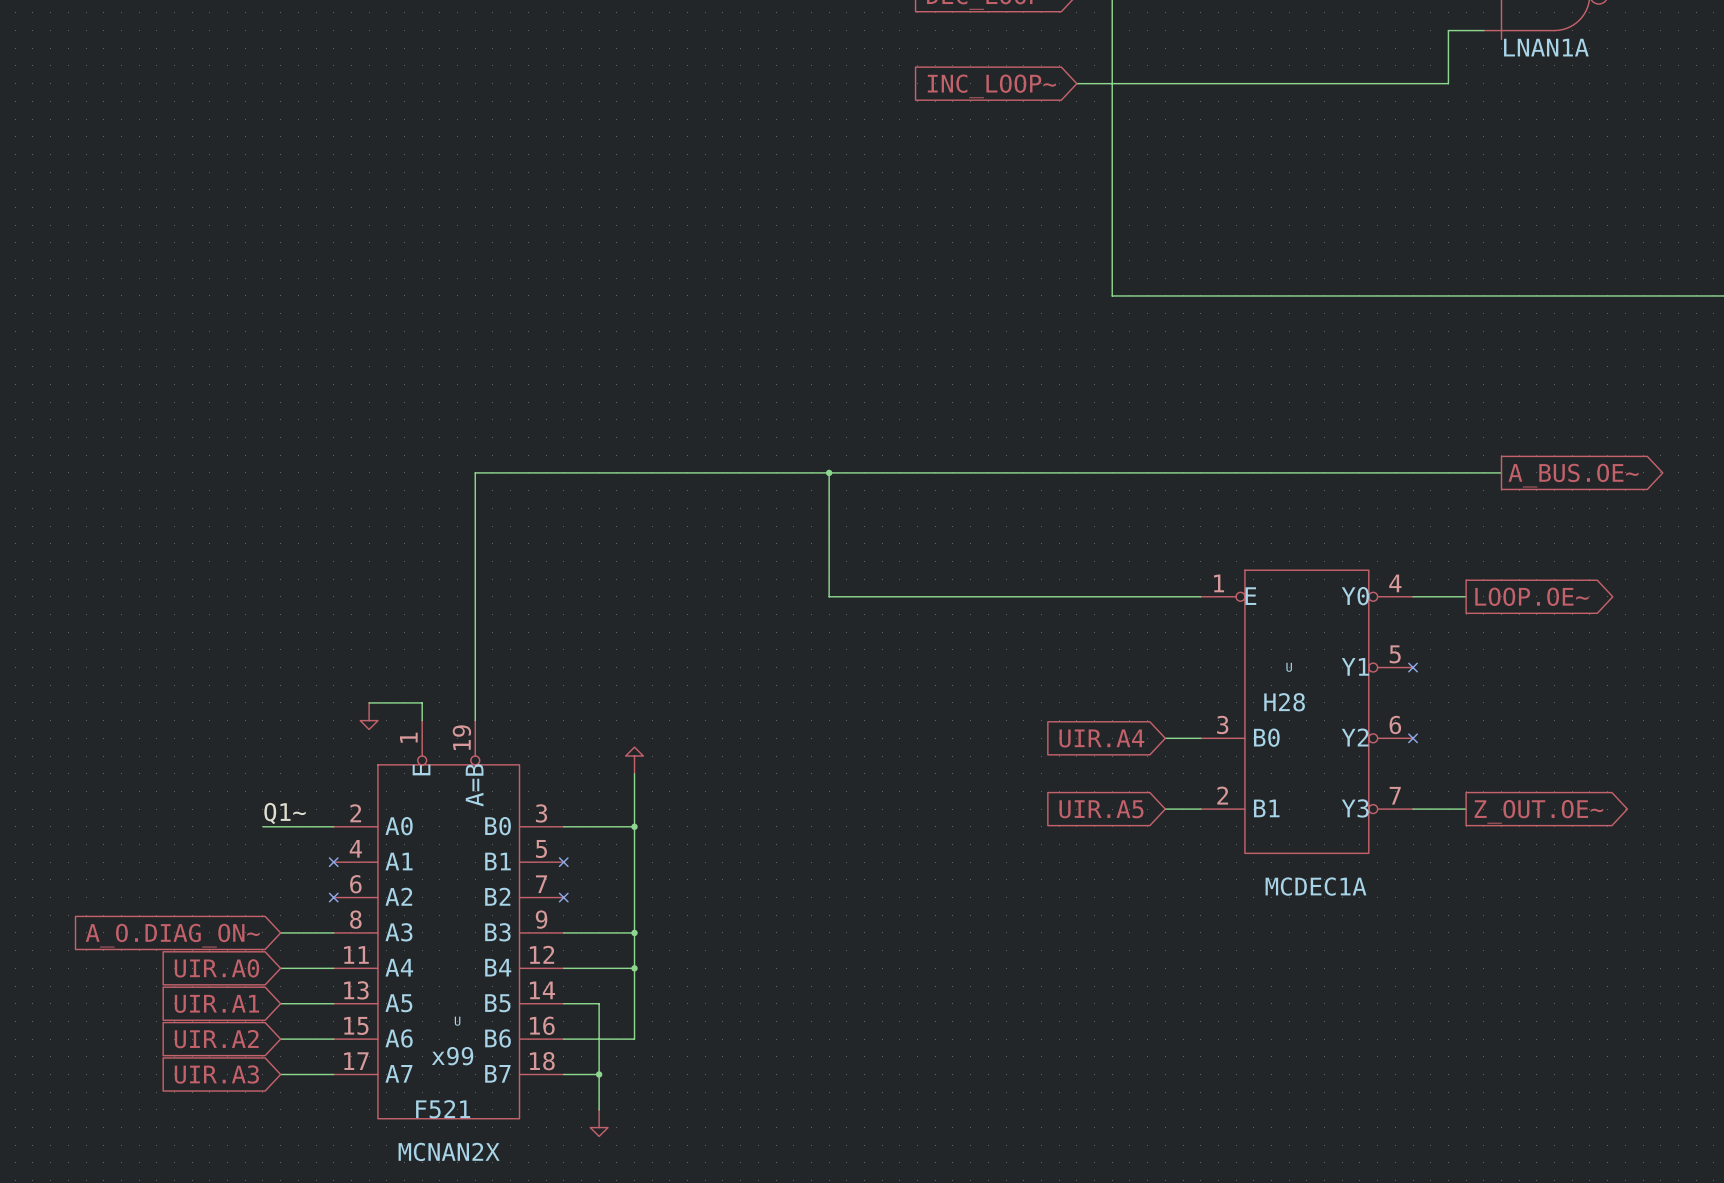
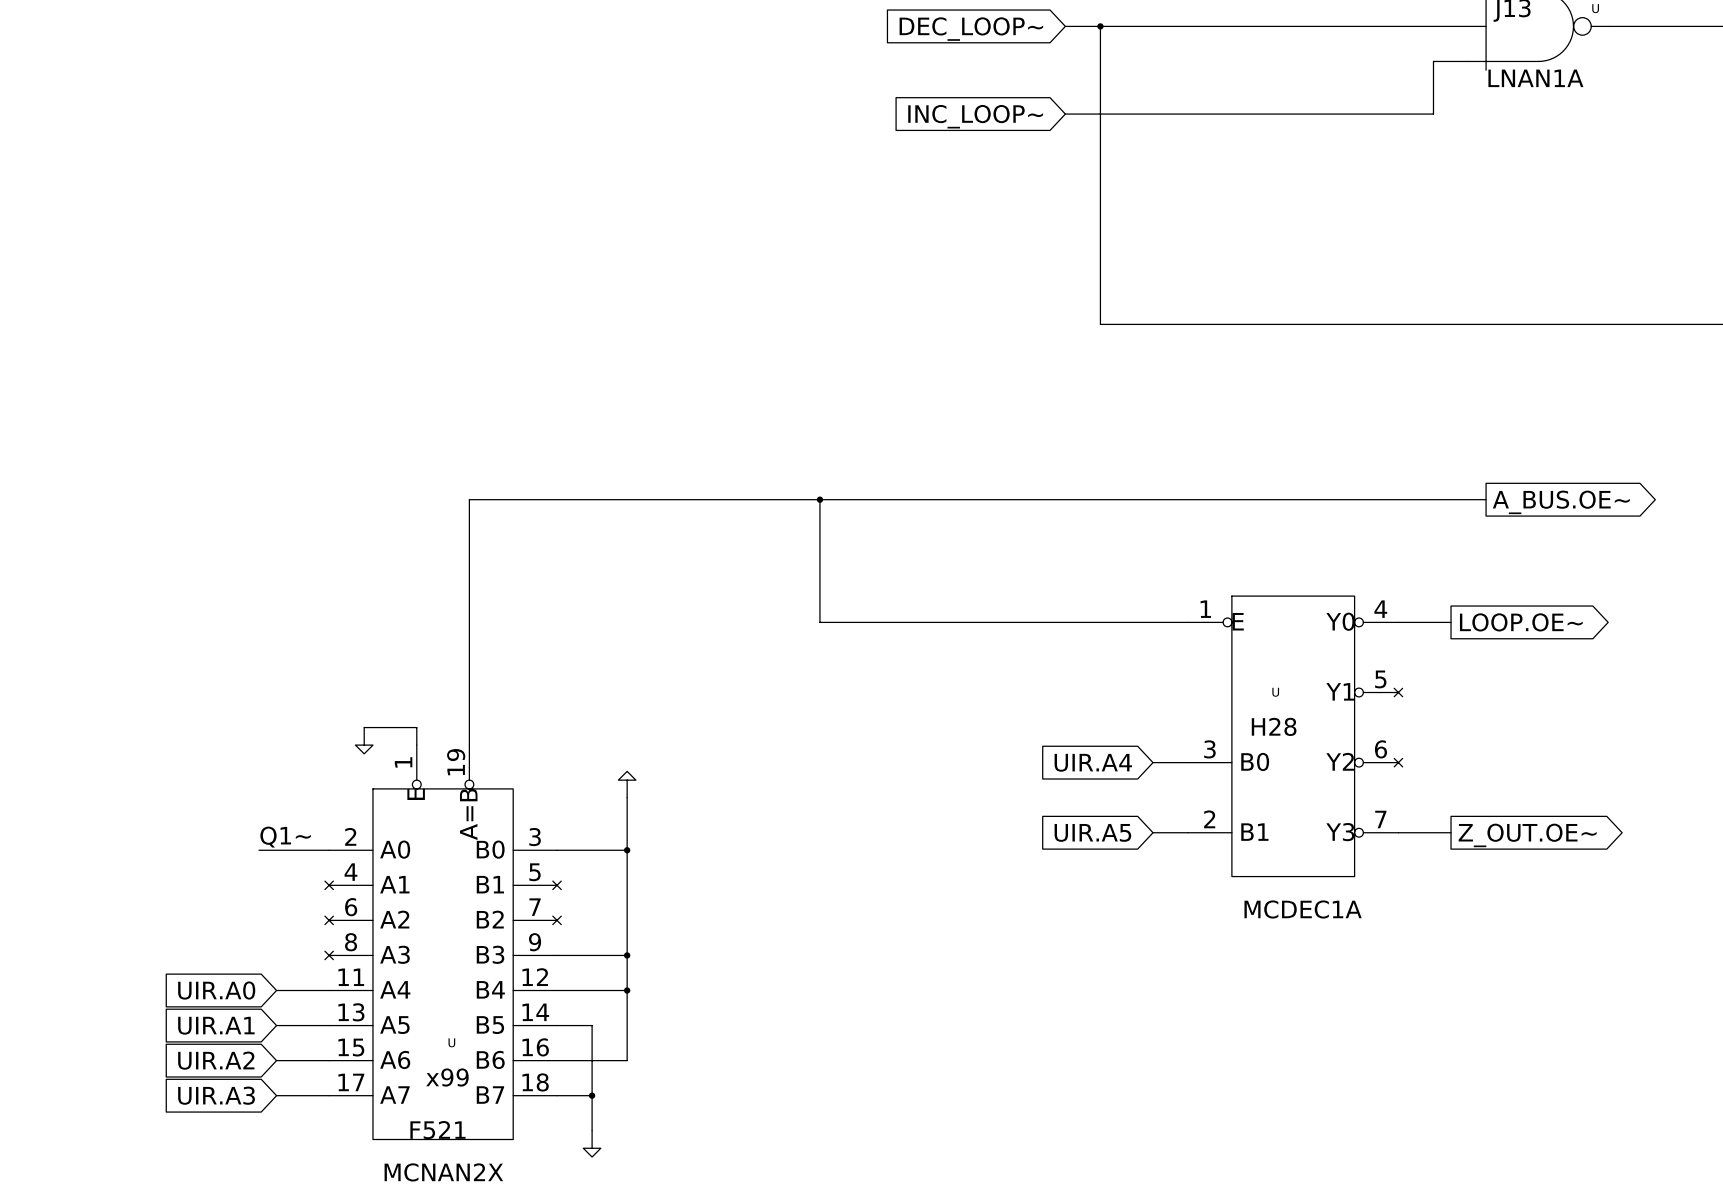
wire: (280, 932) (333, 932) -> none
no-connect mark: none -> (329, 955)
global label: A_O.DIAG_ON~ (172, 935) -> none

